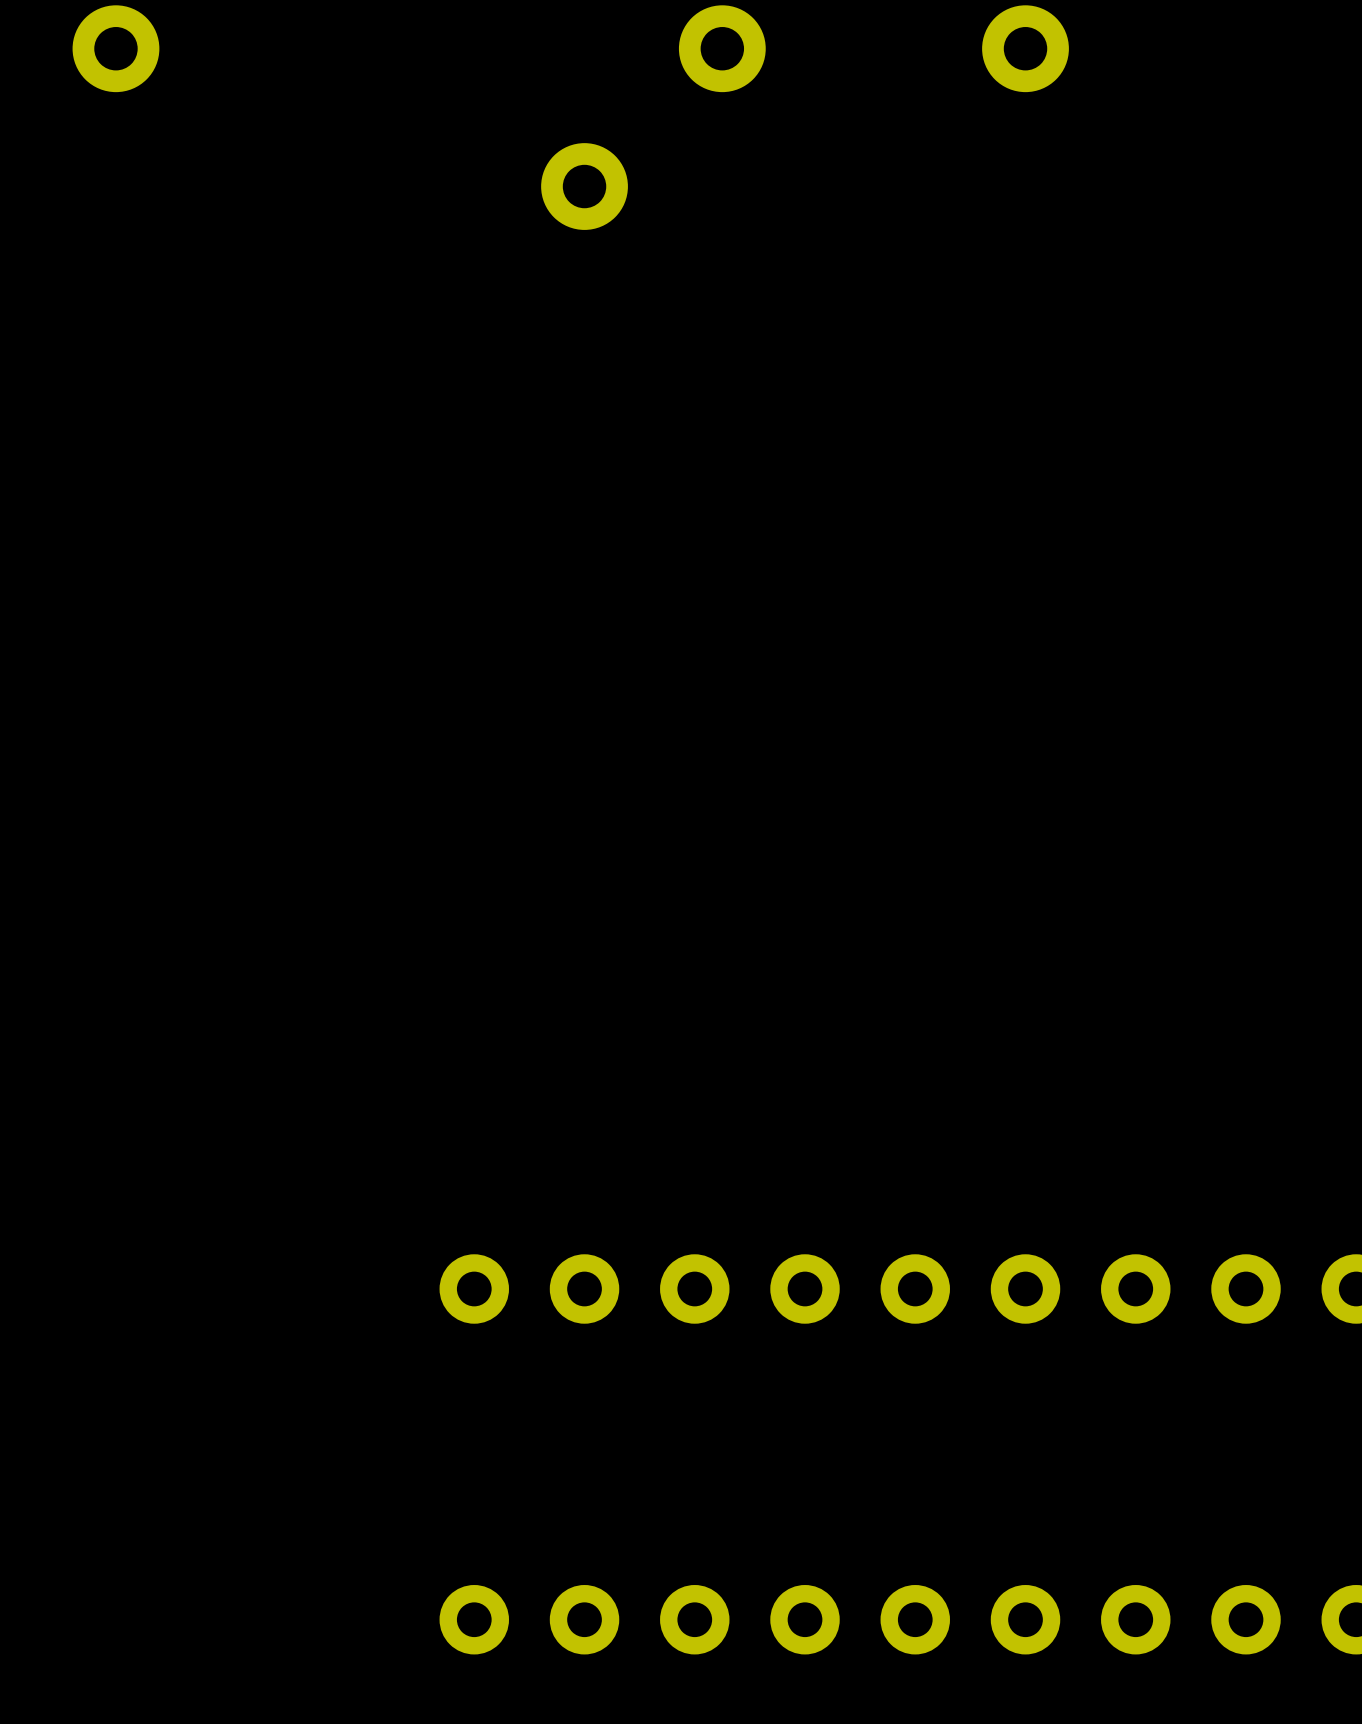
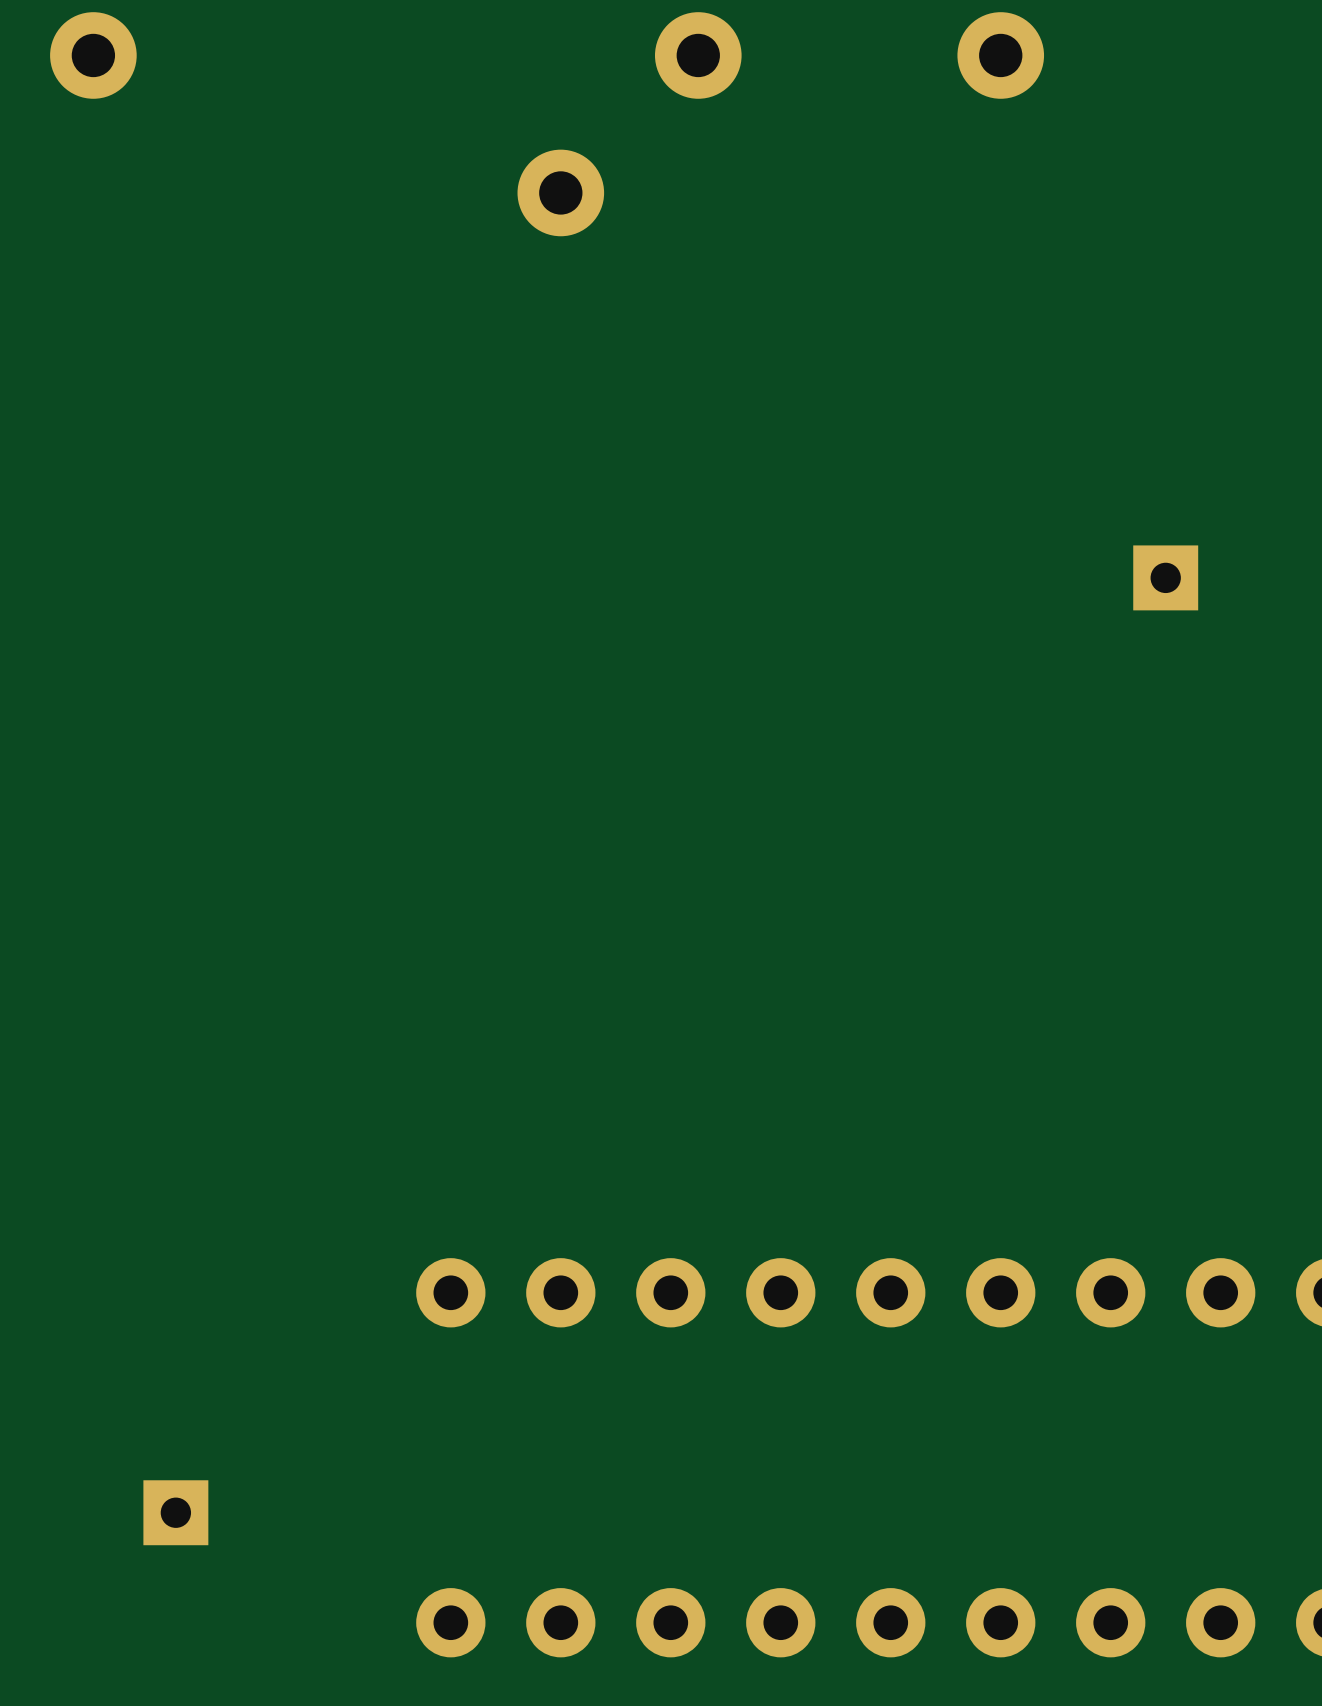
part: none -> (1165, 577)
part: none -> (175, 1512)

